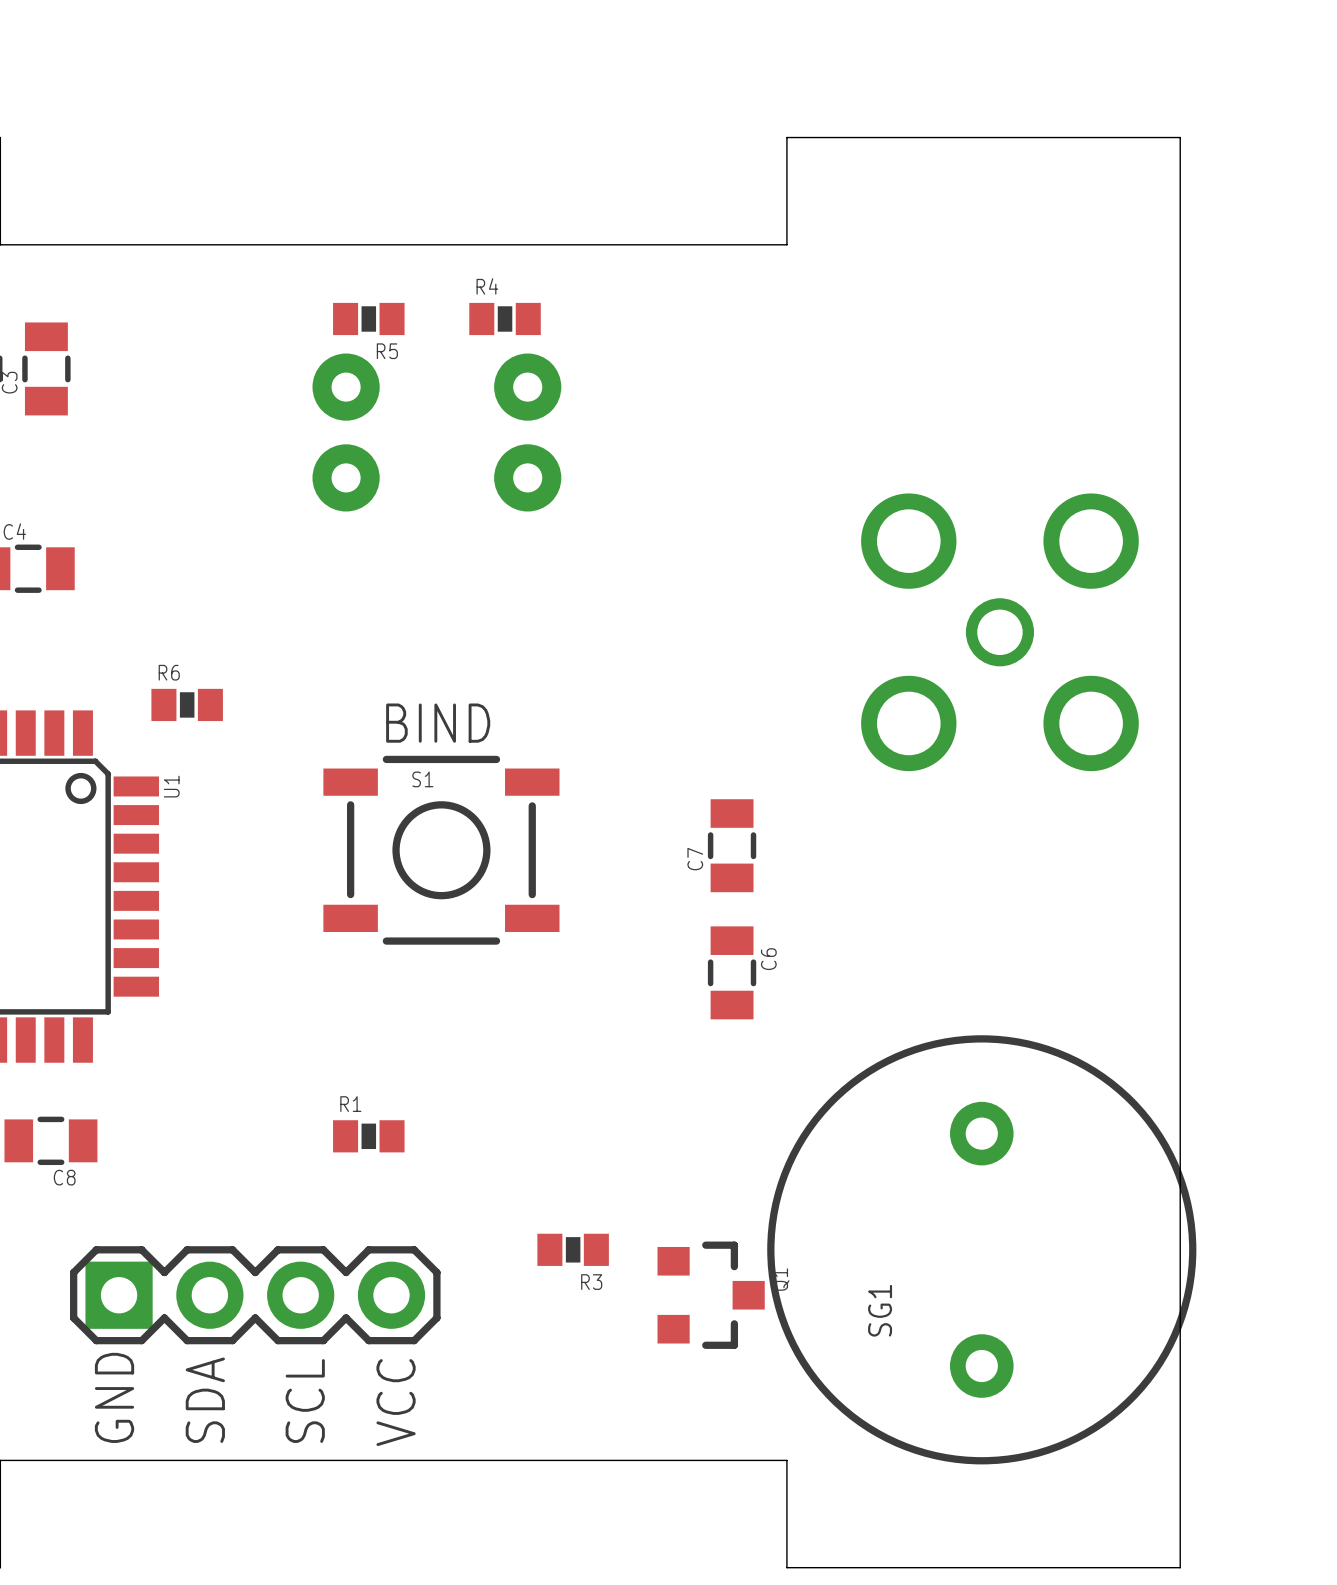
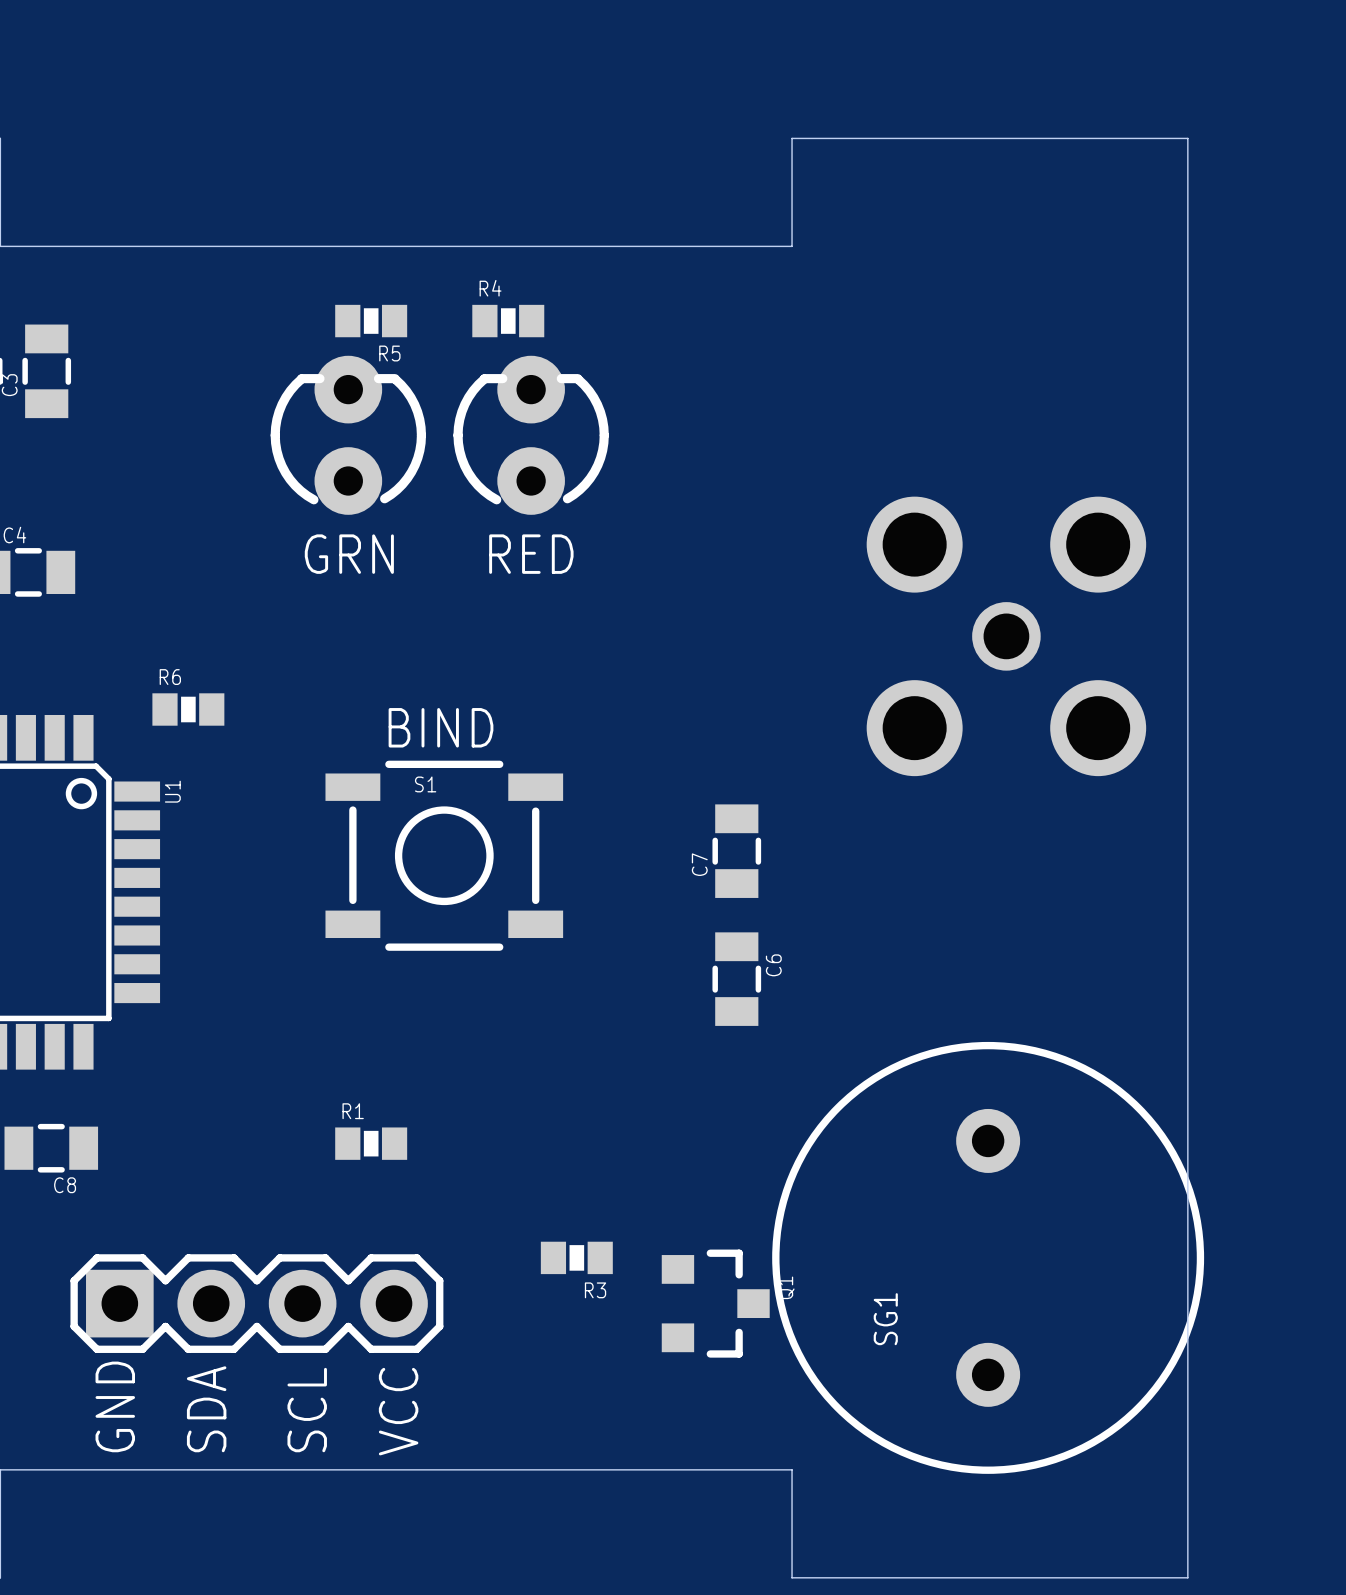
part side: bottom (346, 432) -> top (348, 435)
part side: bottom (527, 432) -> top (531, 435)
text: none -> GRN (349, 554)
text: none -> RED (531, 554)

